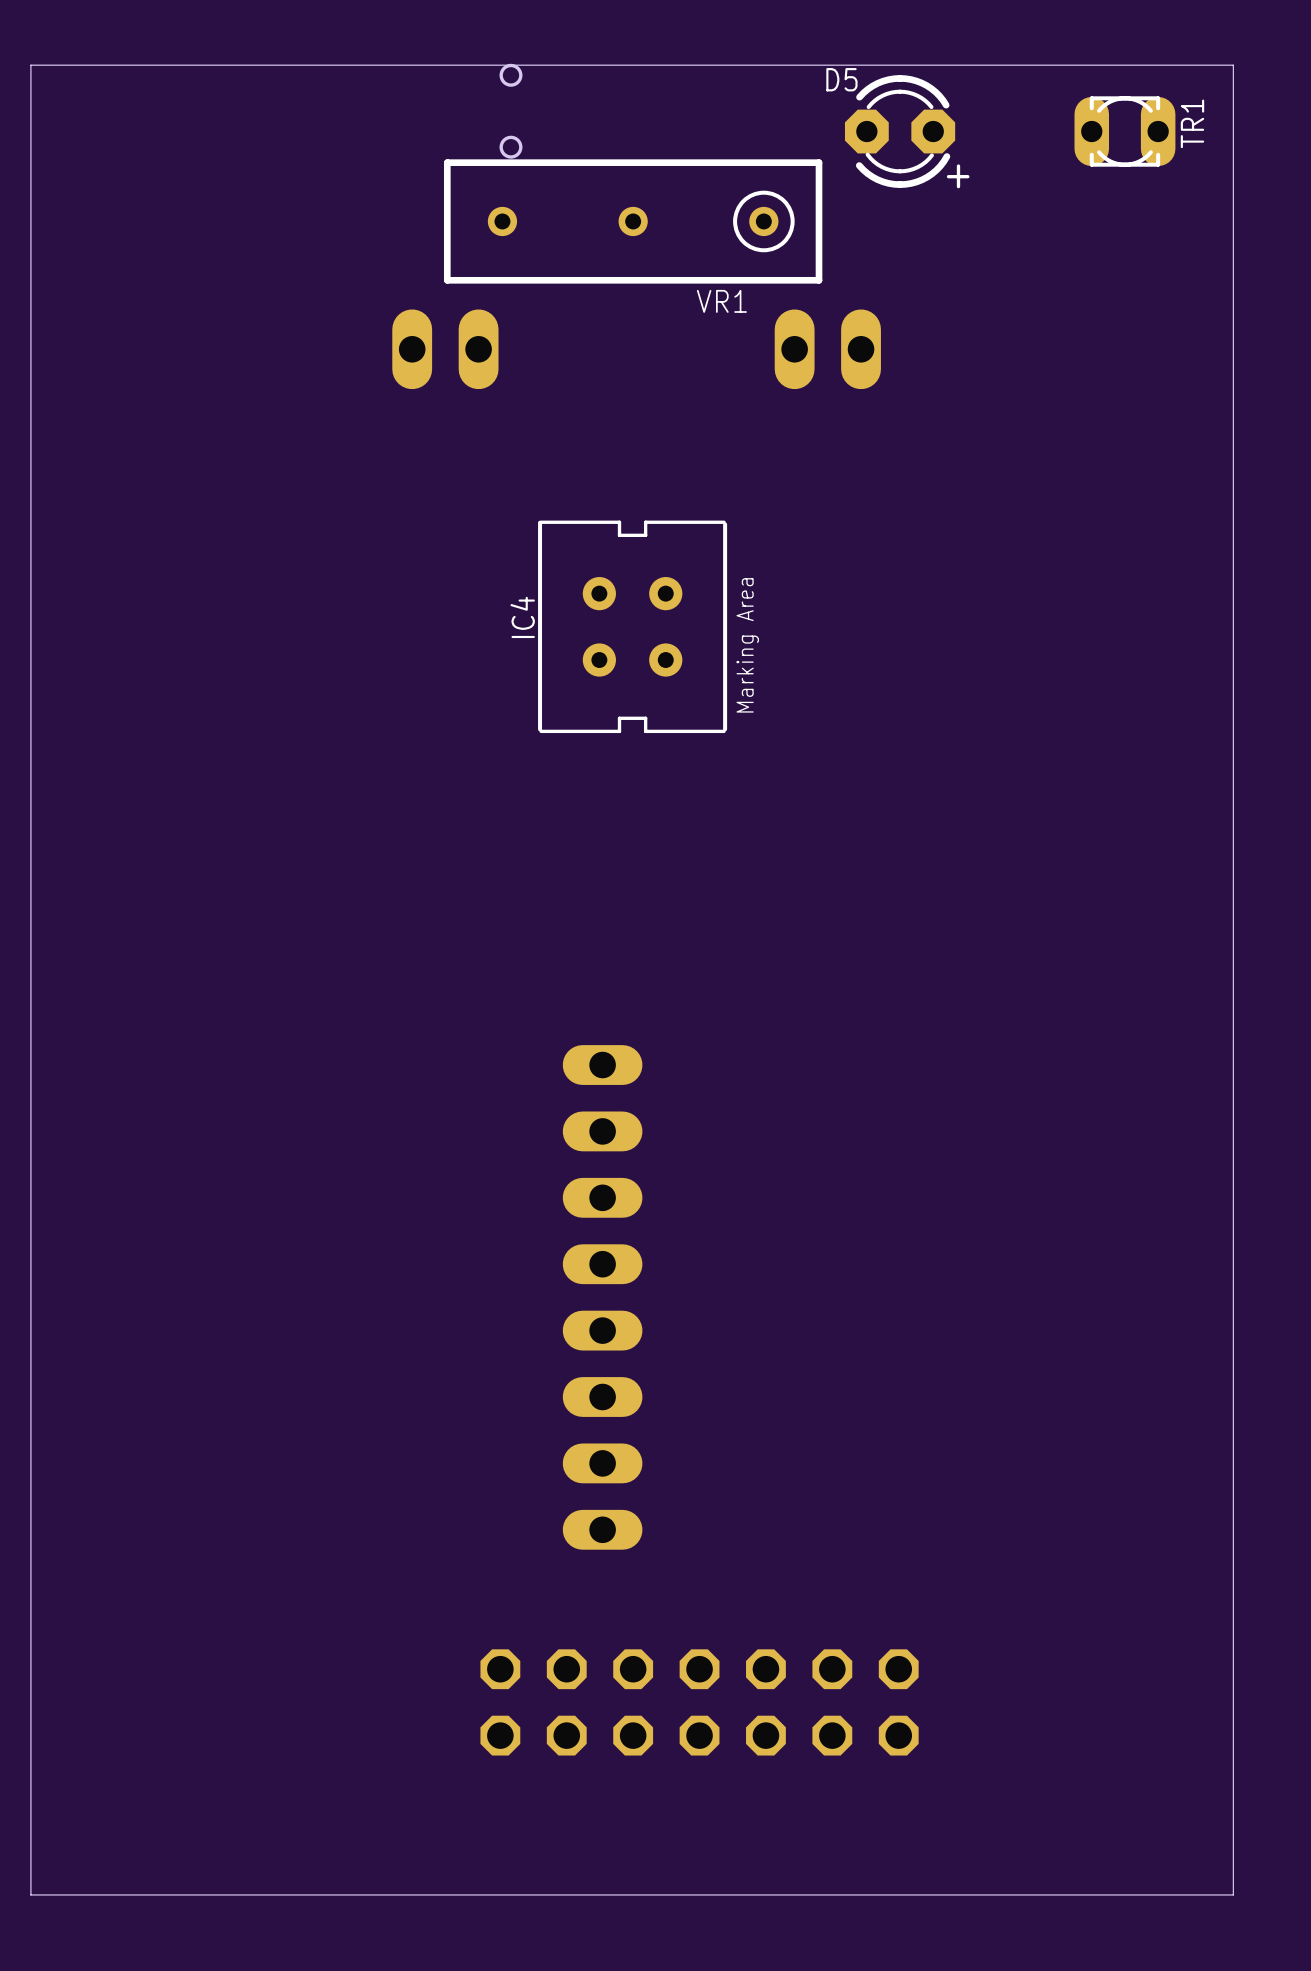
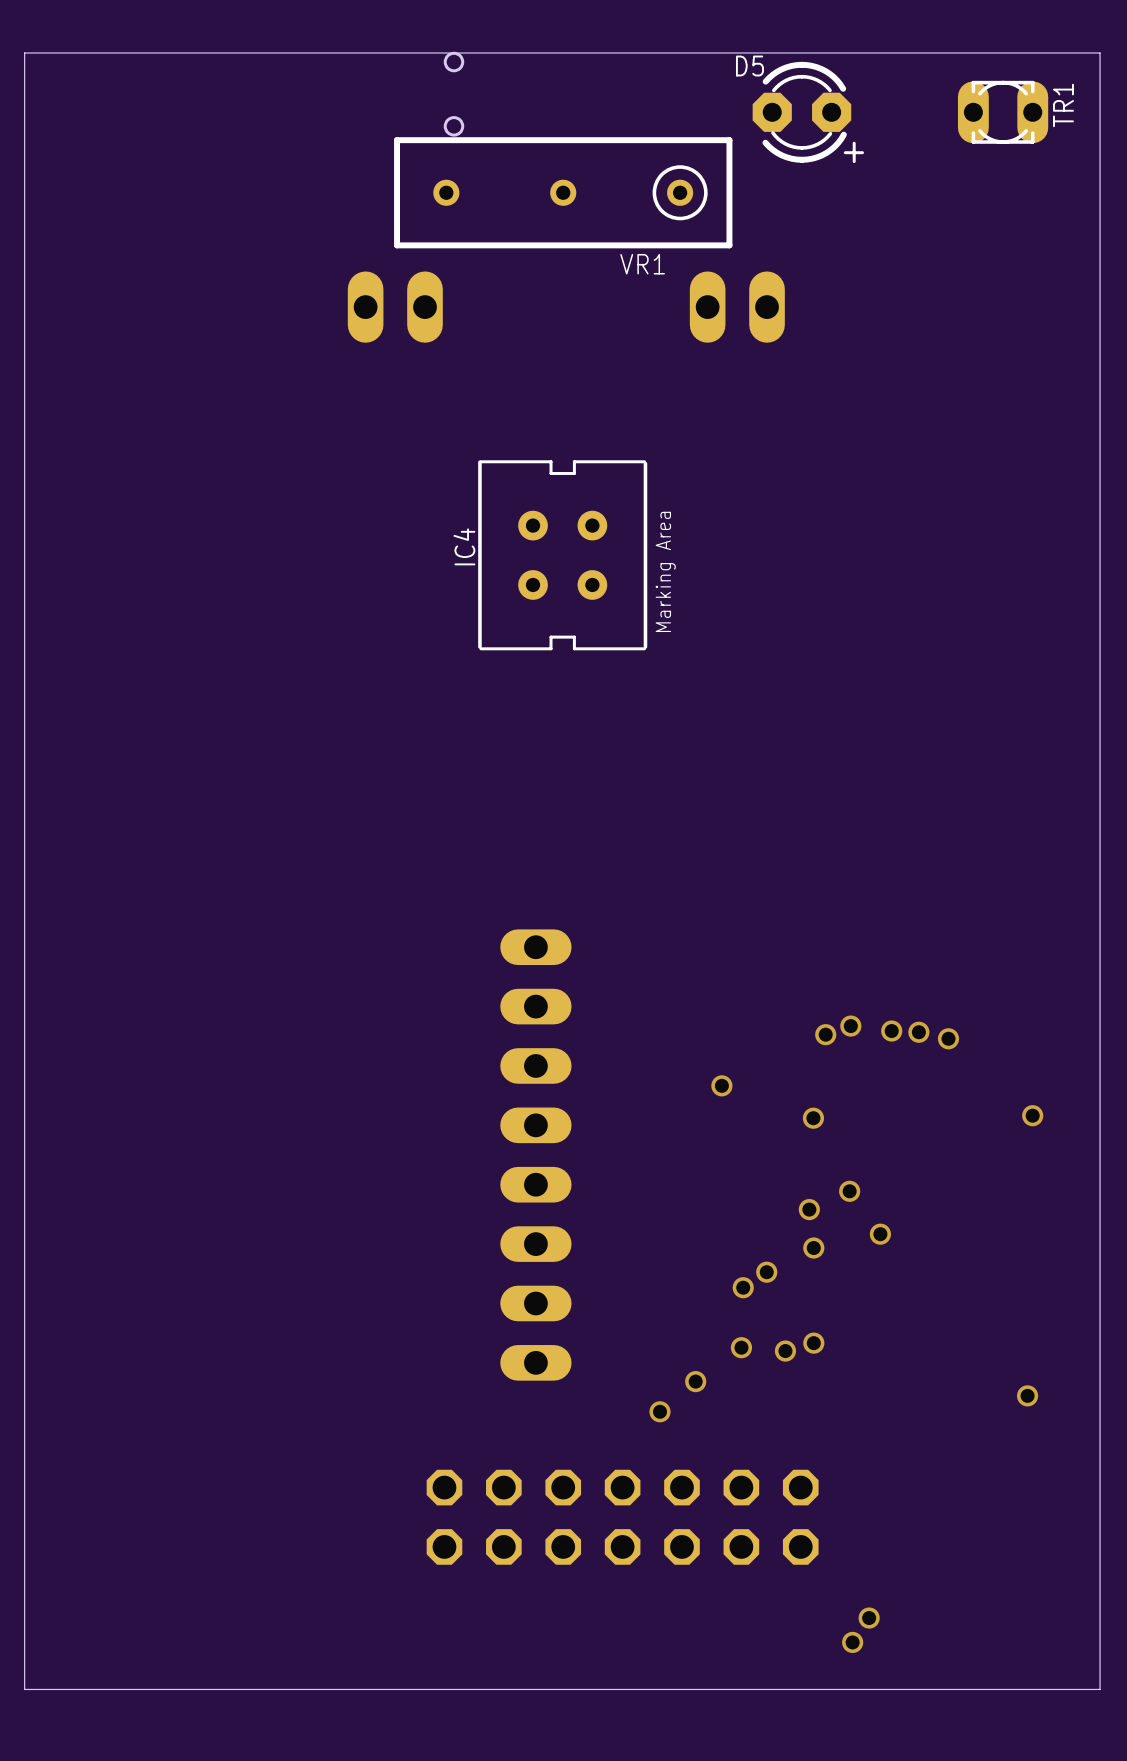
via: none -> (850, 1026)
via: none -> (891, 1031)
via: none -> (918, 1032)
via: none -> (825, 1034)
via: none -> (948, 1038)
via: none -> (721, 1085)
via: none -> (1032, 1115)
via: none -> (813, 1118)
via: none -> (849, 1191)
via: none -> (809, 1209)
via: none -> (880, 1234)
via: none -> (813, 1248)
via: none -> (766, 1272)
via: none -> (743, 1287)
via: none -> (813, 1343)
via: none -> (741, 1347)
via: none -> (785, 1351)
via: none -> (695, 1381)
via: none -> (1027, 1395)
via: none -> (660, 1411)
via: none -> (869, 1618)
via: none -> (852, 1642)

